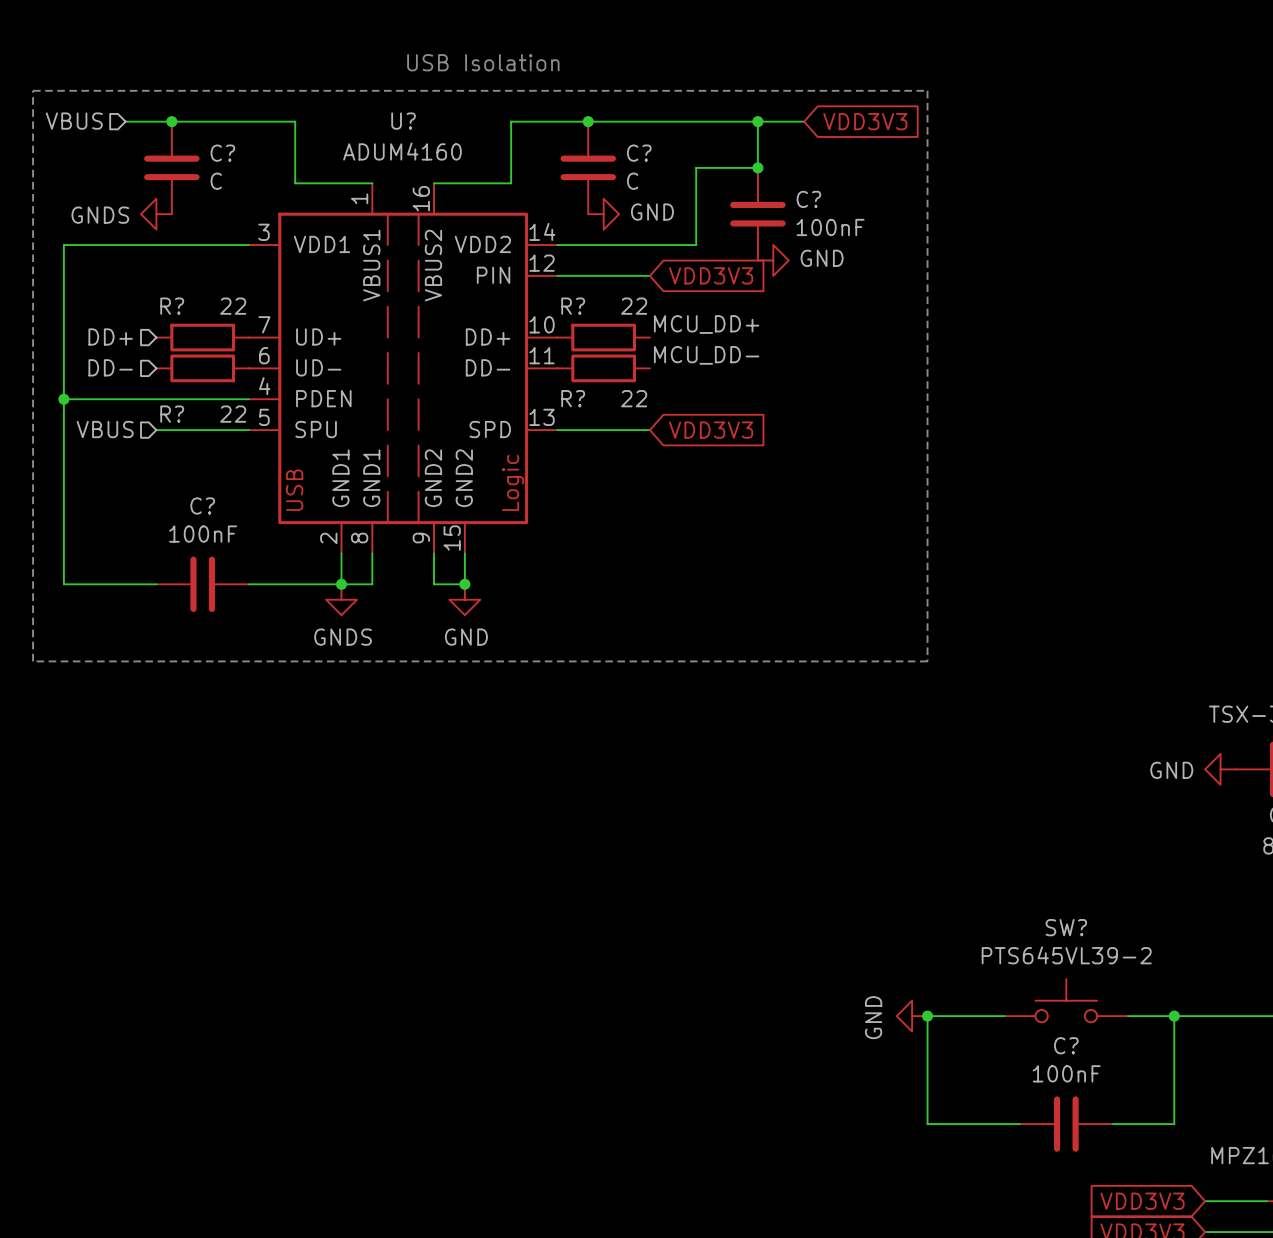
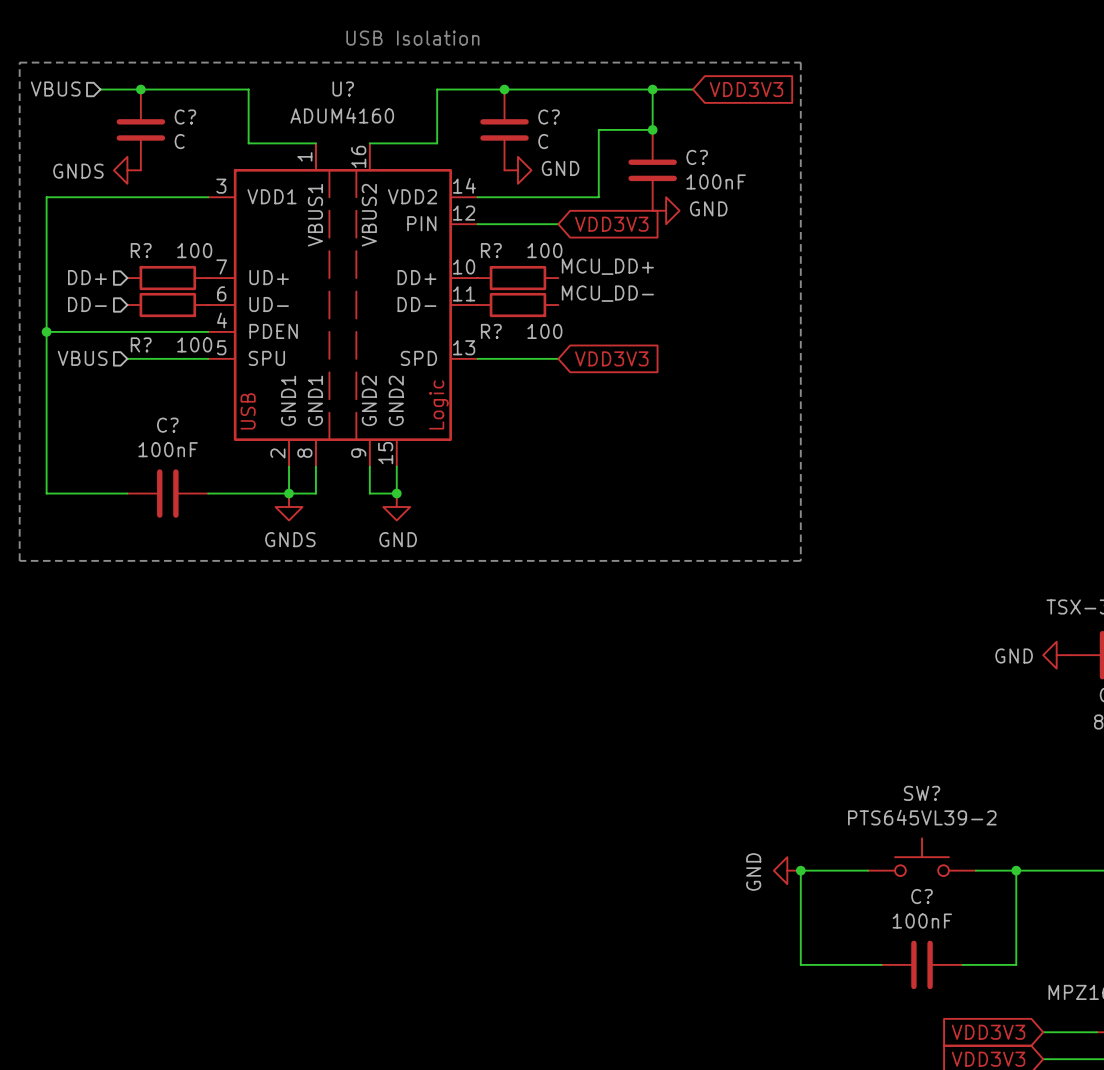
R? value: 22 (233, 306) -> 100 (194, 250)
R? value: 22 (634, 306) -> 100 (544, 250)
R? value: 22 (634, 398) -> 100 (544, 331)
R? value: 22 (233, 414) -> 100 (194, 344)

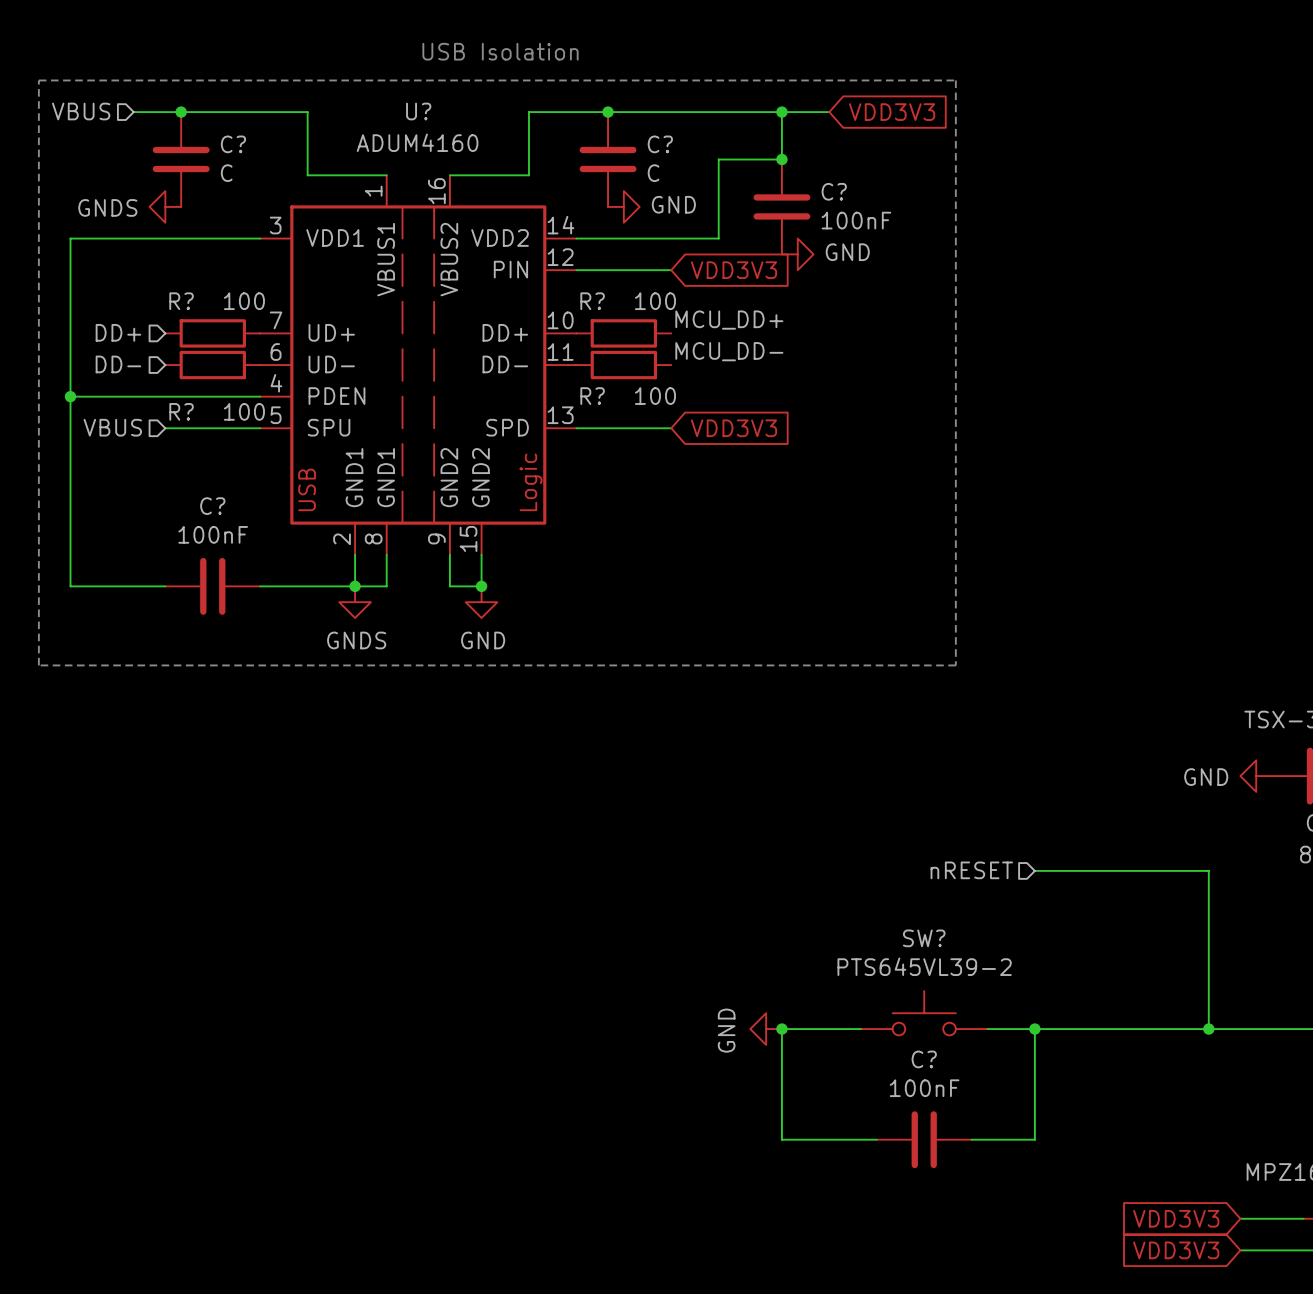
hierarchical label: none -> nRESET (971, 870)
SW? position: (922, 857) -> (924, 1013)
junction: none -> (781, 1029)
wire: none -> (860, 1029) (781, 1029) (781, 1139) (876, 1139)
power symbol position: GND (787, 870) -> GND (766, 1029)
junction: (800, 870) -> none
wire: (827, 870) (800, 870) (800, 964) (814, 964) -> none
junction: none -> (1034, 1029)
wire: (1016, 870) (1016, 964) (962, 964) -> (1208, 1029) (1208, 870) (1034, 870)
wire: (868, 964) (881, 964) -> (1034, 1139) (1034, 1029) (1161, 1029)
C? position: (922, 964) -> (924, 1139)

